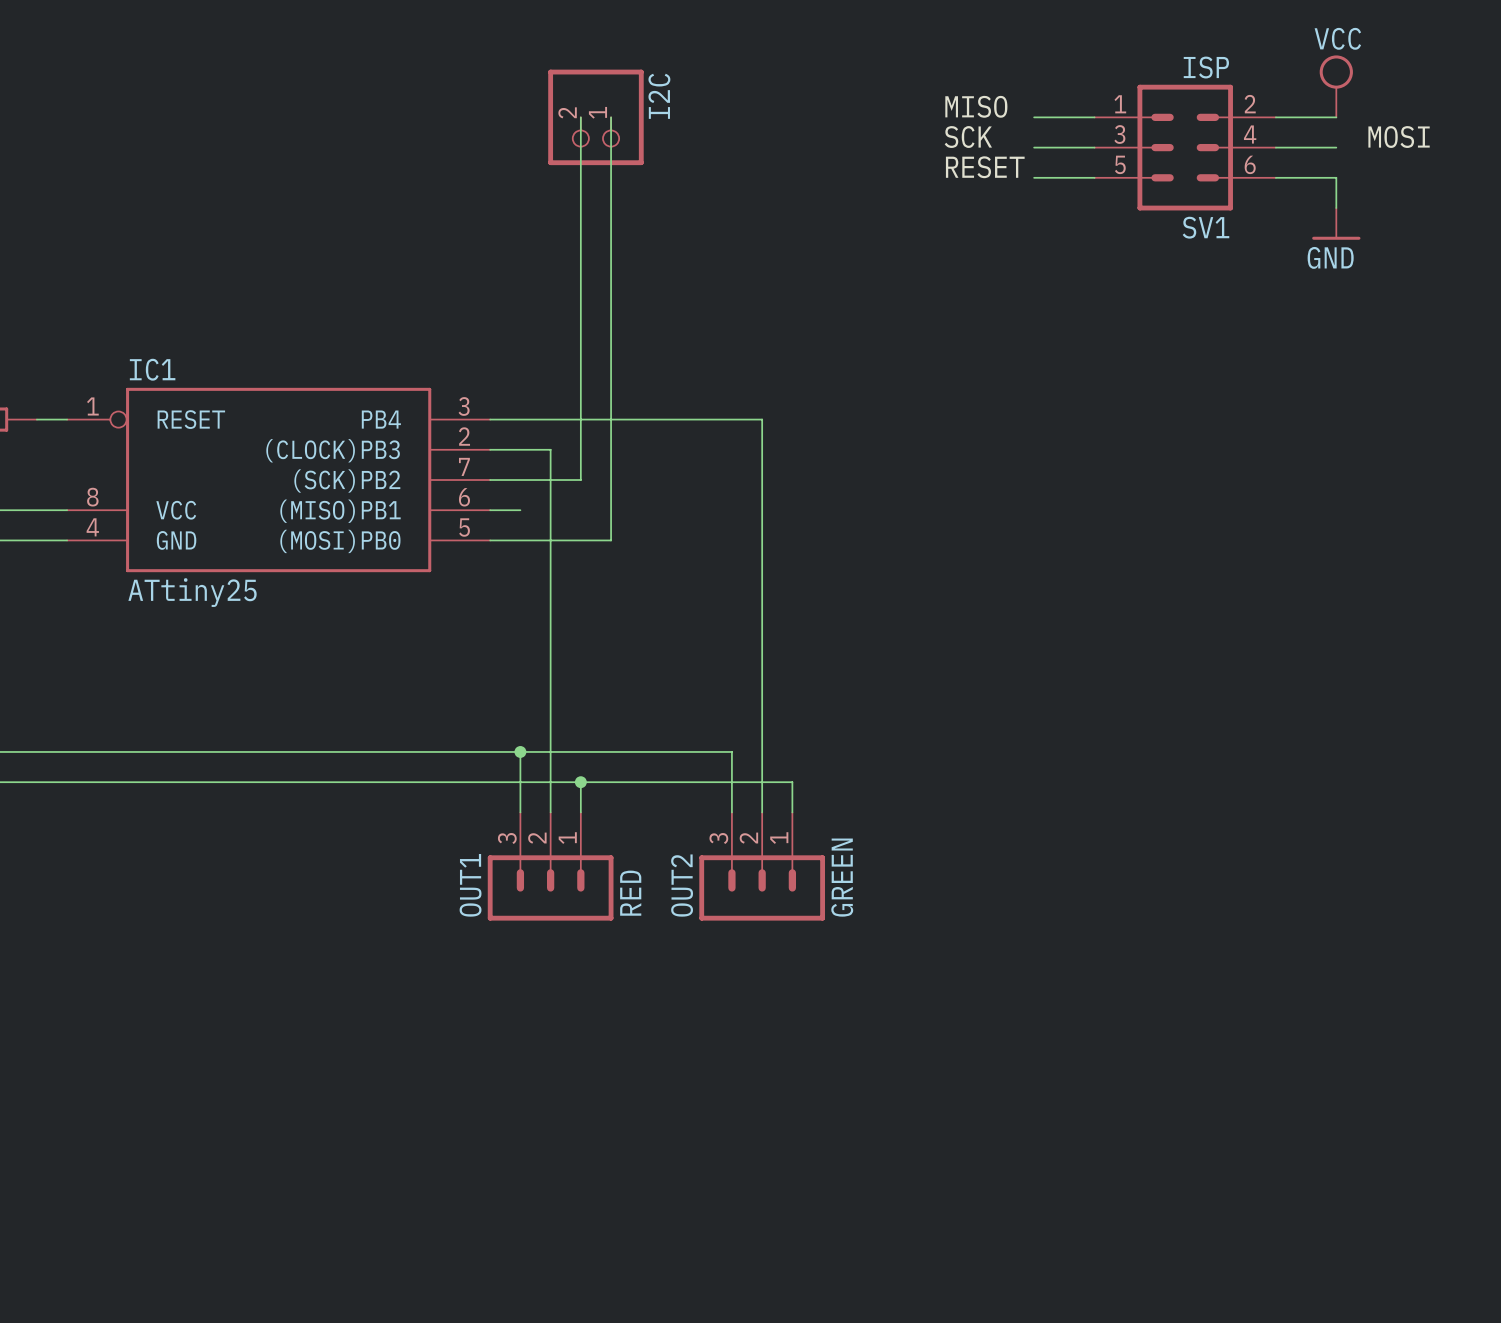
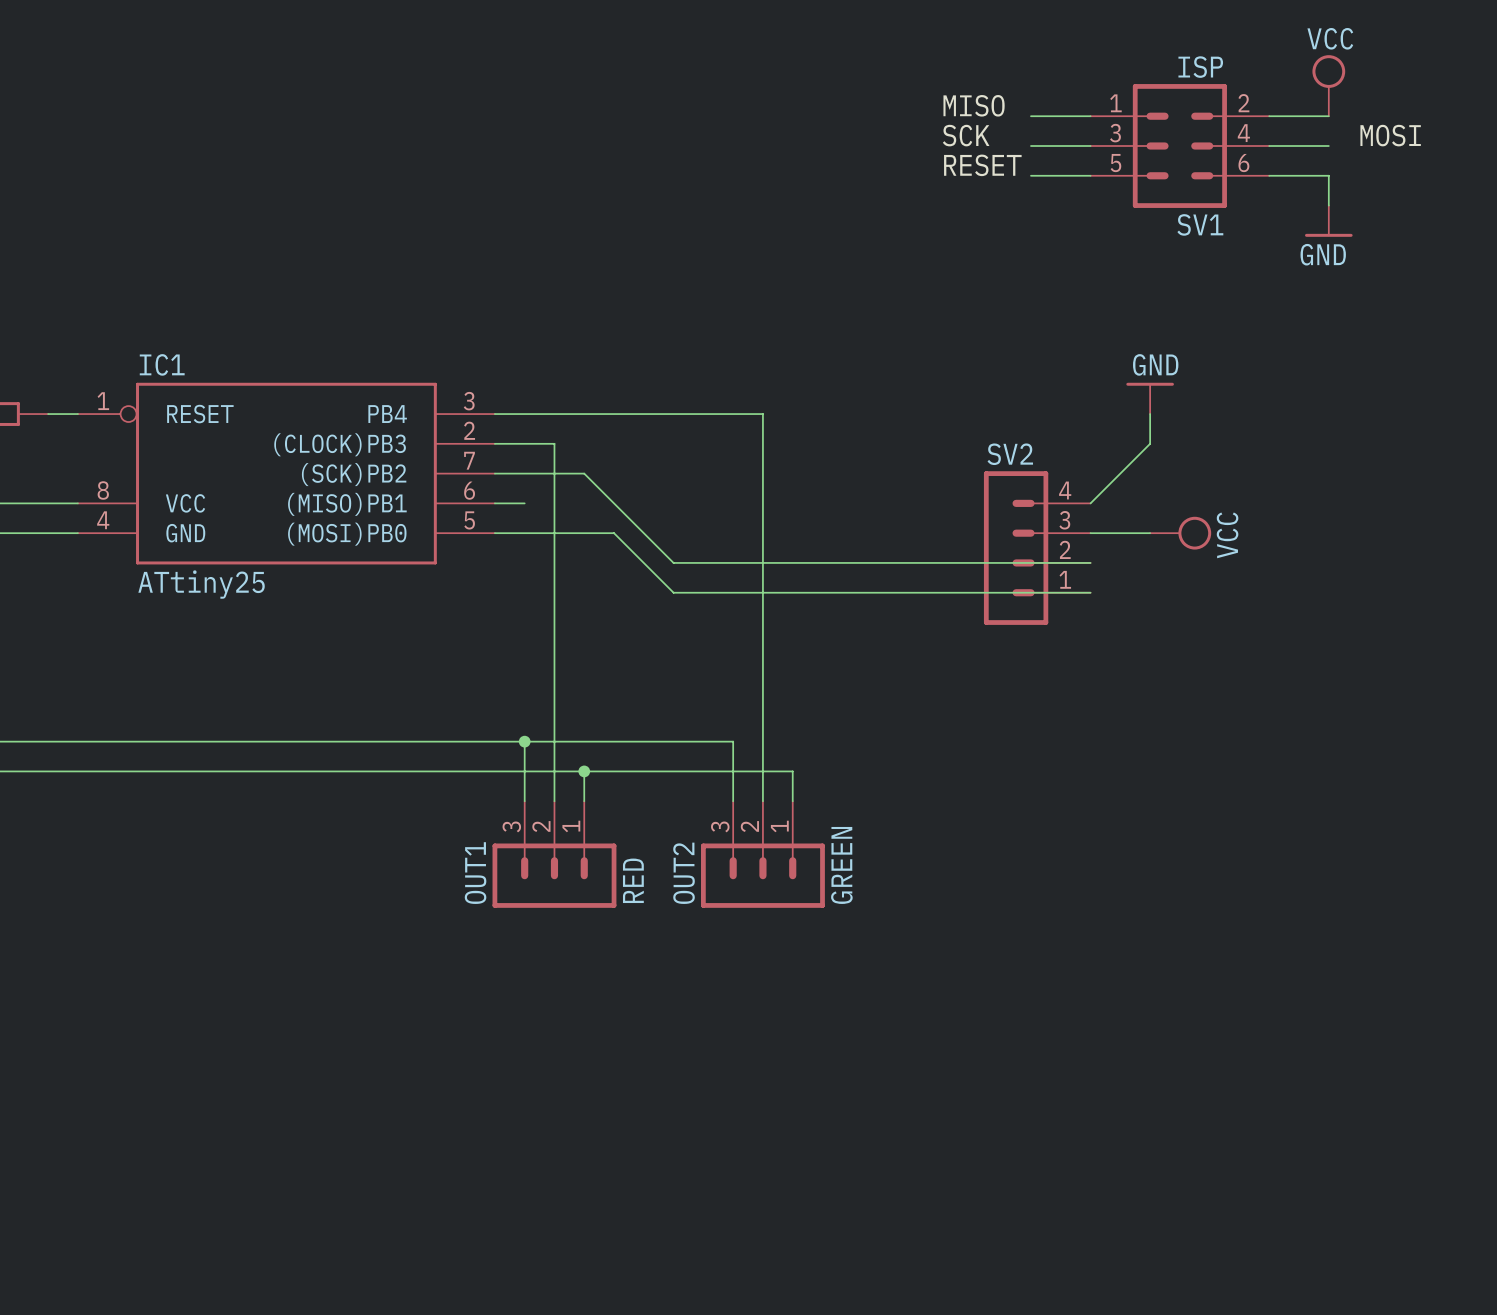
wire: (580, 117) (580, 480) -> (1090, 562) (673, 562) (584, 473)
I2C: (595, 117) -> none
wire: (611, 117) (611, 540) -> (1090, 592) (673, 592) (614, 533)
power symbol: none -> GND (1150, 398)
wire: none -> (1150, 414) (1150, 443) (1090, 503)
wire: none -> (1090, 533) (1150, 533)
power symbol: none -> VCC (1180, 533)
SV2: none -> (1037, 548)

